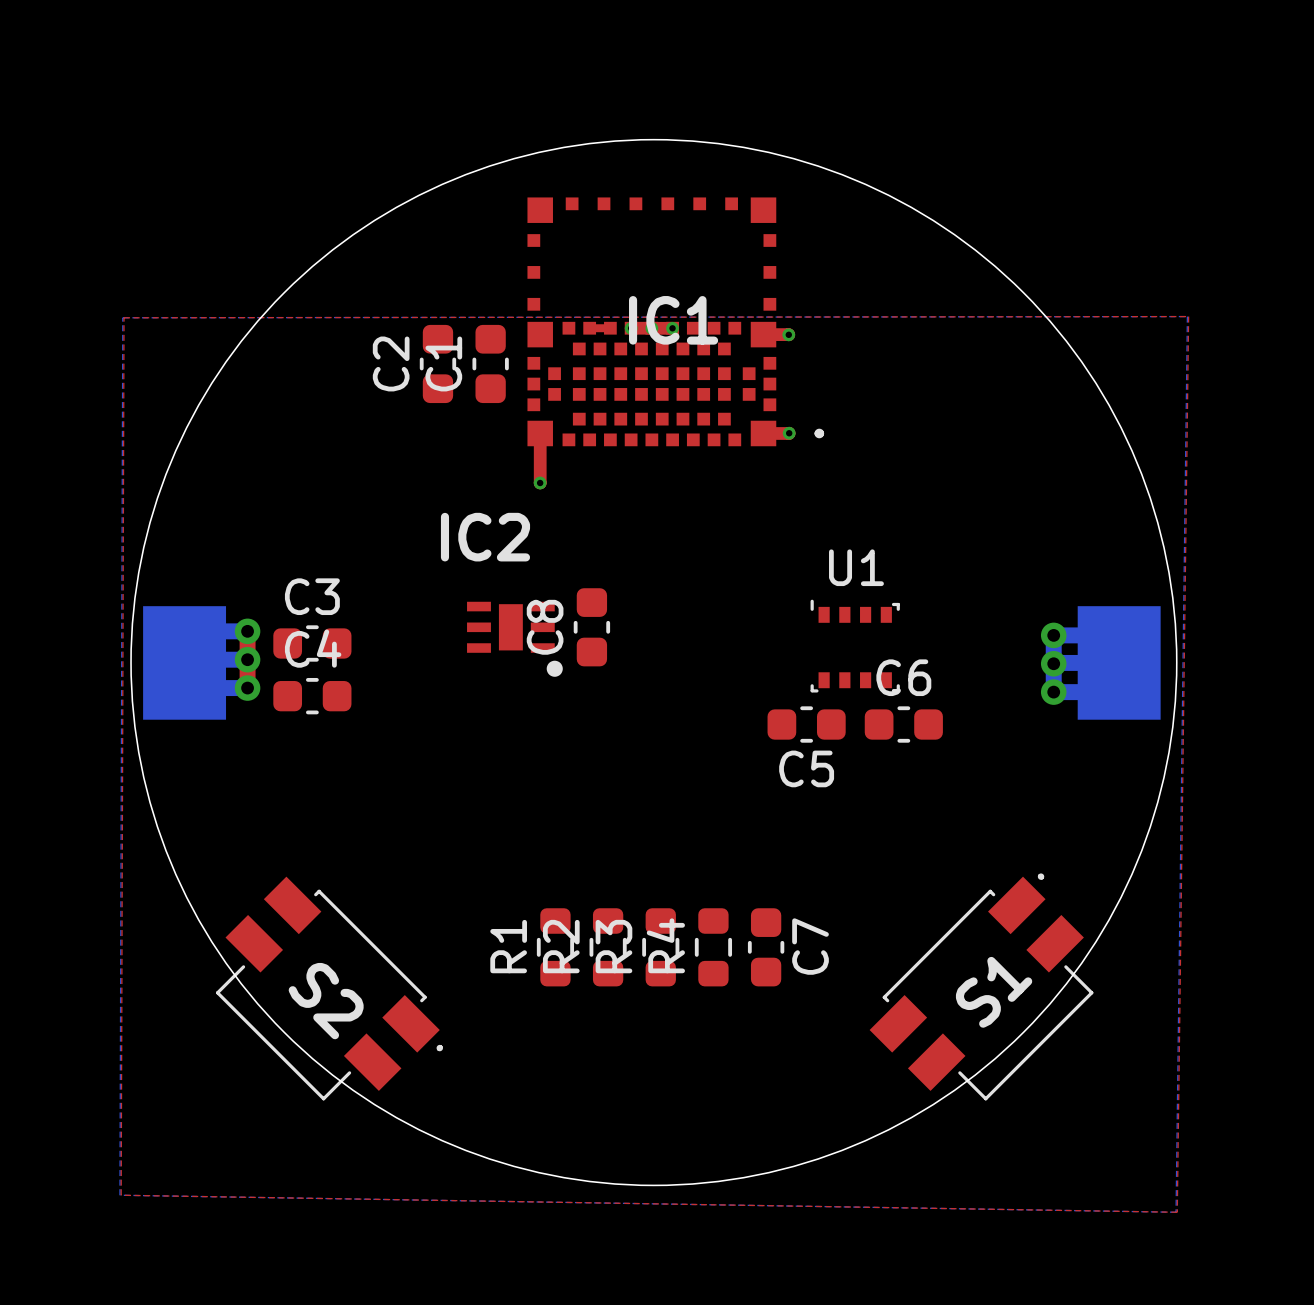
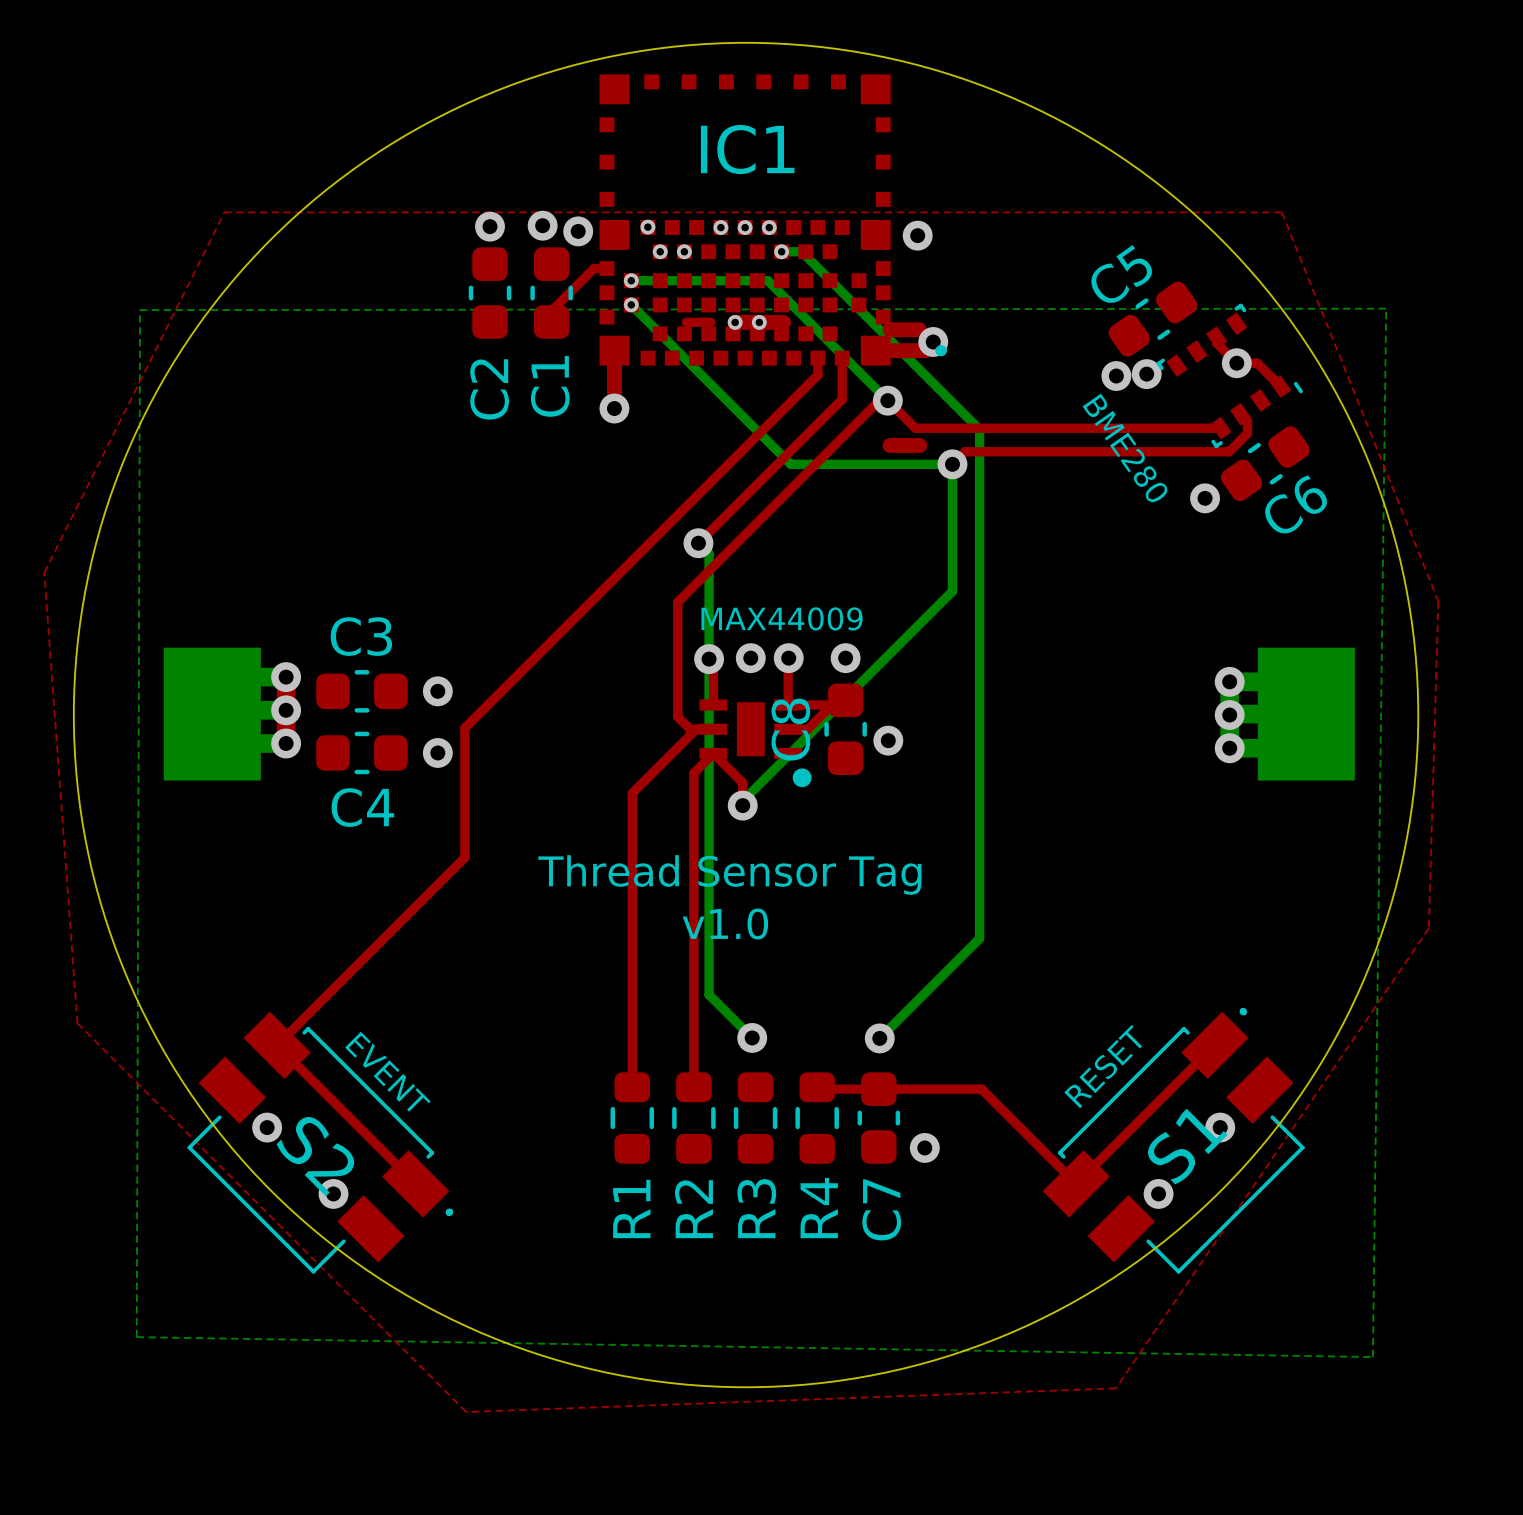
round board edge size: [130, 138, 1178, 1187] -> [72, 41, 1420, 1389]
via: none -> (542, 225)
via: none -> (490, 226)
via: none -> (647, 227)
via: none -> (720, 227)
via: none -> (745, 227)
via: none -> (769, 227)
via: none -> (578, 231)
via: none -> (917, 235)
via: none -> (660, 251)
via: none -> (684, 251)
bottom track: none -> (781, 251) (801, 251) (979, 429) (979, 938) (879, 1038)
via: none -> (781, 251)
top track: none -> (606, 268) (593, 268) (551, 310) (551, 321)
bottom track: none -> (631, 280) (767, 280) (887, 400)
via: none -> (631, 280)
bottom track: none -> (631, 304) (790, 464) (952, 464) (952, 591) (742, 801) (742, 805)
via: none -> (631, 304)
top zone outline: (1188, 316) (124, 317) (121, 1195) (1177, 1212) (1188, 316) -> (224, 212) (44, 572) (77, 1023) (466, 1412) (1115, 1388) (1428, 928) (1438, 601) (1281, 212) (224, 212)
IC1 name position: IC1 (673, 320) -> IC1 (747, 149)
IC1 position: (675, 321) -> (773, 220)
via: (672, 328) -> none
via size: [782, 328, 796, 342] -> [918, 327, 949, 357]
top track: none -> (1216, 337) (1216, 343) (1236, 363) (1257, 363) (1280, 386)
top track: none -> (933, 341) (924, 350) (875, 350)
top track: none -> (817, 358) (817, 374) (464, 727) (464, 857) (277, 1045) (415, 1183)
top track: none -> (842, 358) (842, 399) (698, 543)
C2 name position: C2 (391, 363) -> C2 (489, 389)
C2 position: (437, 363) -> (490, 293)
C1 name position: C1 (443, 363) -> C1 (550, 386)
C1 position: (490, 363) -> (551, 293)
via: none -> (1236, 363)
via: none -> (1146, 374)
part: none -> (1229, 375)
via: none -> (1116, 376)
via: none -> (887, 400)
via: none -> (614, 408)
top track: none -> (1240, 414) (1247, 421) (1247, 433) (1229, 451) (965, 451) (952, 464)
top track: none -> (1220, 428) (915, 428) (887, 400) (879, 400) (677, 602) (677, 716) (690, 729) (713, 729)
top track: (540, 433) (540, 482) -> (614, 350) (614, 408)
via: (789, 433) -> none
text: none -> BME280 (1125, 447)
via: none -> (952, 464)
via: none -> (1205, 498)
via: (540, 482) -> none
bottom track: none -> (698, 543) (709, 553) (709, 994) (752, 1037)
via: none -> (698, 543)
text: none -> MAX44009 (782, 618)
top track: none -> (709, 659) (713, 663) (713, 704)
via: none -> (709, 659)
via: none -> (750, 658)
top track: none -> (788, 658) (788, 704) (840, 704) (845, 700) (836, 700) (807, 729) (788, 729)
via: none -> (788, 658)
via: none -> (845, 658)
C8 position: (591, 627) -> (845, 729)
IC2: (514, 639) -> none
via: none -> (437, 691)
U1: (855, 646) -> none
C4 name position: C4 (313, 648) -> C4 (362, 807)
top track: none -> (696, 729) (632, 793) (632, 1087)
C6 name position: C6 (903, 677) -> C6 (1295, 504)
via: none -> (888, 740)
part: none -> (755, 743)
via: none -> (437, 752)
C5 rotation: 0° (806, 724) -> 35° counterclockwise (1152, 319)
C5 position: (806, 724) -> (1152, 319)
C6 rotation: 0° (903, 724) -> 35° counterclockwise (1265, 463)
C6 position: (903, 724) -> (1265, 463)
top track: none -> (742, 805) (742, 782) (713, 753) (693, 773) (693, 1087)
via: none -> (742, 805)
C5 name position: C5 (806, 768) -> C5 (1121, 274)
text: none -> Thread Sensor Tag (729, 874)
text: none -> v1.0 (725, 924)
via: none -> (752, 1037)
via: none -> (879, 1038)
R4 name position: R4 (665, 945) -> R4 (819, 1208)
top track: none -> (1214, 1045) (1076, 1183) (981, 1089) (819, 1089) (817, 1087)
R1 name position: R1 (508, 946) -> R1 (631, 1208)
R2 name position: R2 (561, 946) -> R2 (693, 1209)
R3 name position: R3 (613, 946) -> R3 (756, 1208)
C7 name position: C7 (810, 946) -> C7 (881, 1209)
R1 position: (555, 947) -> (632, 1118)
R2 position: (608, 947) -> (693, 1118)
R3 position: (660, 947) -> (755, 1118)
R4 position: (713, 947) -> (817, 1118)
C7 position: (766, 947) -> (878, 1118)
text: none -> RESET (1103, 1066)
text: none -> EVENT (387, 1071)
S1 position: (981, 986) -> (1173, 1140)
S2 position: (329, 988) -> (320, 1142)
via: none -> (267, 1127)
via: none -> (1220, 1127)
via: none -> (924, 1147)
via: none -> (333, 1193)
via: none -> (1158, 1193)

